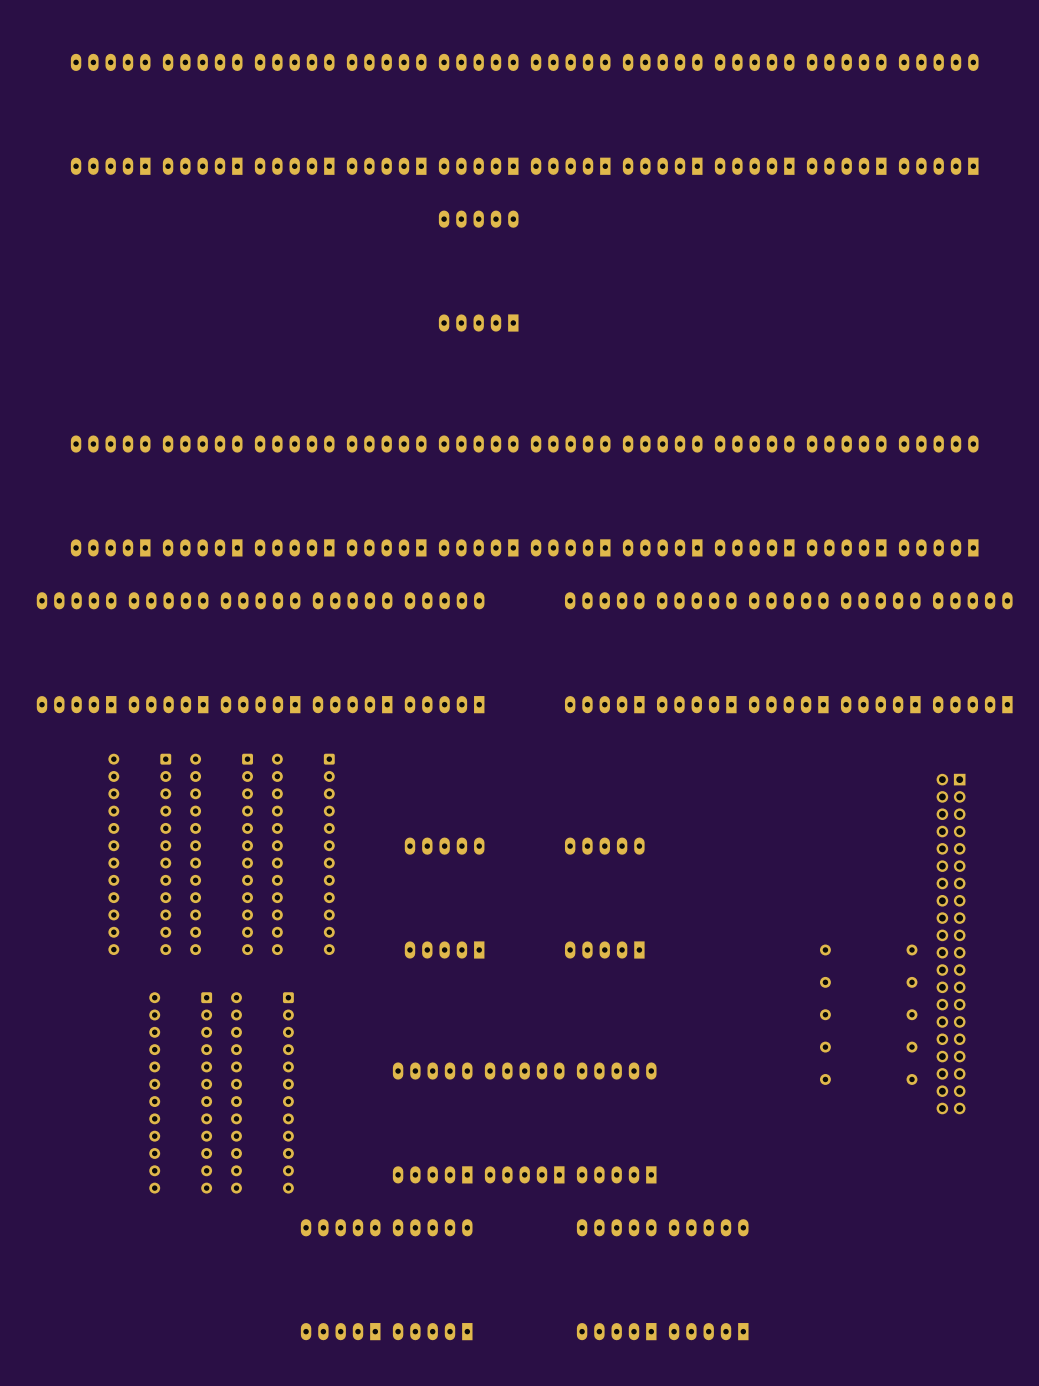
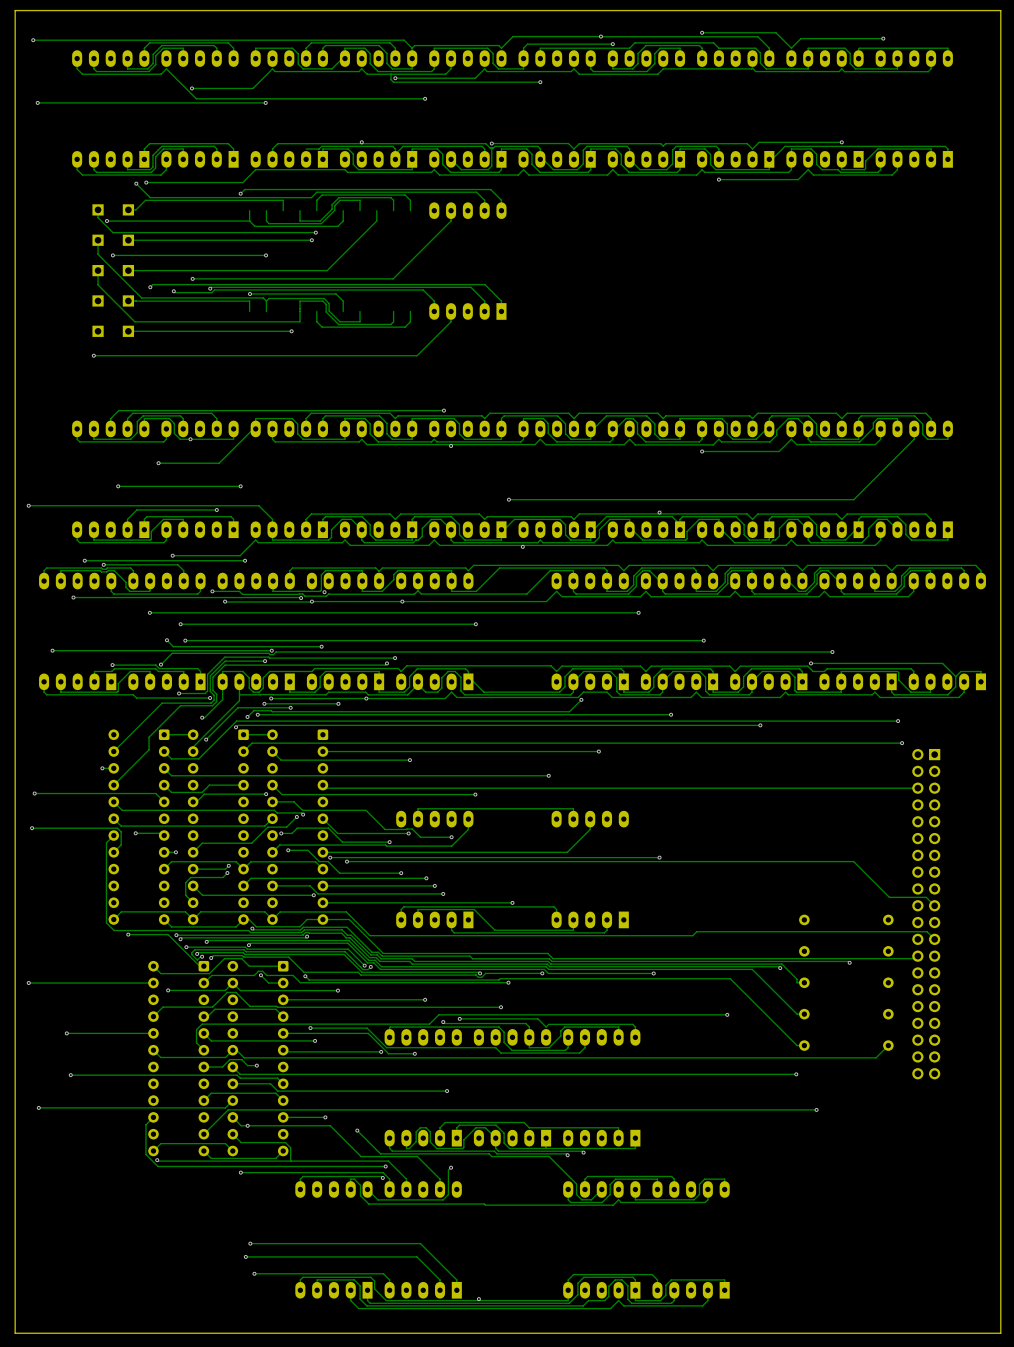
board edge: none -> (1000, 10) (15, 10) (15, 1333) (1000, 1333) (1000, 10)
track: none -> (702, 32) (775, 32) (791, 48) (801, 38) (883, 38)
via: none -> (702, 32)
via: none -> (600, 36)
via: none -> (883, 38)
track: none -> (33, 40) (404, 40) (412, 48)
via: none -> (33, 40)
track: none -> (612, 44) (527, 44) (523, 48) (523, 68) (498, 68) (493, 63) (493, 53) (487, 48) (434, 48) (434, 68) (431, 71) (378, 71) (370, 63) (370, 53) (364, 48) (344, 48) (344, 58)
via: none -> (612, 44)
track: none -> (412, 48) (412, 68) (392, 68) (386, 63) (386, 53) (379, 45) (325, 45) (322, 48) (322, 58)
track: none -> (412, 48) (414, 45) (498, 45) (501, 48) (513, 36) (757, 36) (769, 48) (769, 58)
track: none -> (344, 55) (331, 68) (303, 68) (298, 63) (298, 53) (292, 48) (255, 48) (255, 58)
track: none -> (77, 58) (77, 68) (82, 74) (161, 74) (166, 68) (196, 98) (425, 98)
track: none -> (183, 58) (183, 48) (163, 48) (155, 55) (155, 64) (148, 71) (96, 71) (93, 68) (93, 58)
track: none -> (216, 58) (216, 48) (214, 45) (161, 45) (153, 54) (153, 63) (147, 68) (127, 68) (127, 58)
track: none -> (233, 58) (233, 48) (228, 42) (149, 42) (144, 48) (144, 58)
track: none -> (395, 58) (395, 48) (390, 42) (311, 42) (306, 48) (306, 58)
track: none -> (451, 58) (451, 68) (445, 74) (367, 74) (361, 68) (359, 71) (275, 71) (272, 68) (252, 88) (191, 88)
track: none -> (680, 58) (680, 48) (660, 48) (654, 53) (654, 63) (646, 71) (593, 71) (590, 68) (590, 58)
track: none -> (702, 58) (702, 48) (699, 45) (646, 45) (638, 53) (638, 63) (632, 68) (612, 68) (612, 58)
track: none -> (897, 58) (897, 68) (855, 68) (850, 63) (850, 53) (844, 48) (808, 48) (808, 68) (766, 68) (760, 63) (760, 53) (755, 48) (718, 48) (713, 42) (634, 42) (629, 48) (540, 48) (540, 58)
track: none -> (931, 58) (931, 68) (928, 71) (844, 71) (841, 68) (839, 71) (755, 71) (752, 68) (663, 68) (657, 74) (579, 74) (573, 68) (571, 71) (487, 71) (484, 68) (475, 78) (395, 78)
track: none -> (947, 58) (947, 48) (859, 48) (858, 58)
track: none -> (391, 74) (391, 79) (393, 82) (540, 82)
via: none -> (395, 78)
via: none -> (540, 82)
via: none -> (191, 88)
via: none -> (425, 98)
via: none -> (37, 102)
track: none -> (265, 102) (37, 102)
via: none -> (265, 102)
via: none -> (361, 142)
track: none -> (841, 142) (759, 142) (752, 149) (747, 143) (665, 143) (663, 146) (660, 143) (579, 143) (573, 149) (568, 143) (491, 143)
via: none -> (841, 142)
via: none -> (491, 143)
track: none -> (491, 148) (491, 166) (488, 169) (461, 169) (451, 159)
track: none -> (306, 149) (319, 149) (321, 146) (392, 146) (395, 149) (395, 159)
track: none -> (395, 154) (403, 146) (482, 146) (484, 149) (484, 159)
track: none -> (540, 156) (553, 169) (577, 169) (583, 163) (583, 150) (587, 146) (626, 146) (629, 149) (629, 159) (639, 169) (666, 169) (672, 163) (672, 150) (676, 146) (716, 146) (718, 149) (718, 159)
track: none -> (166, 159) (166, 169) (161, 175) (82, 175) (77, 169) (77, 159)
track: none -> (183, 159) (183, 149) (163, 149) (155, 156) (155, 168) (151, 172) (96, 172) (93, 169) (93, 159)
track: none -> (216, 159) (216, 149) (214, 146) (161, 146) (152, 155) (152, 167) (150, 169) (127, 169) (127, 159)
track: none -> (233, 159) (233, 149) (228, 143) (149, 143) (144, 149) (144, 159)
track: none -> (540, 159) (540, 149) (537, 146) (490, 148) (485, 143) (277, 143) (272, 149) (272, 159)
track: none -> (769, 159) (769, 169) (715, 169) (710, 164) (710, 154) (705, 149) (680, 149) (680, 169) (677, 172) (629, 172) (621, 164) (621, 154) (615, 149) (590, 149) (590, 169) (588, 172) (540, 172) (531, 164) (531, 154) (526, 149) (501, 149) (501, 169) (498, 172) (450, 172) (442, 164) (442, 154) (437, 149) (412, 149) (412, 169) (358, 169) (353, 164) (353, 154) (348, 149) (322, 149) (322, 159)
track: none -> (880, 159) (880, 169) (878, 172) (840, 172) (838, 169) (822, 169) (816, 164) (816, 154) (811, 149) (791, 149) (791, 169) (788, 172) (704, 172) (702, 169) (696, 175) (618, 175) (612, 169) (607, 175) (528, 175) (523, 169) (518, 175) (439, 175) (434, 169) (431, 172) (255, 169) (242, 182) (146, 182)
track: none -> (897, 159) (897, 169) (892, 175) (813, 175) (808, 169) (798, 179) (718, 179)
track: none -> (931, 159) (931, 149) (877, 149) (865, 161) (864, 169) (841, 169) (841, 159)
track: none -> (947, 159) (947, 149) (945, 146) (785, 146) (769, 162)
via: none -> (718, 179)
via: none -> (146, 182)
track: none -> (136, 183) (150, 197) (311, 197) (316, 192) (476, 192) (484, 200) (484, 210)
via: none -> (136, 183)
track: none -> (240, 193) (244, 189) (490, 189) (501, 200) (501, 210)
via: none -> (240, 193)
track: none -> (98, 209) (98, 217) (112, 232) (315, 232)
part: none -> (98, 209)
track: none -> (128, 209) (136, 209) (145, 200) (283, 200) (283, 210)
part: none -> (128, 209)
track: none -> (249, 210) (249, 221)
track: none -> (343, 210) (343, 221) (337, 226) (254, 226) (249, 221)
track: none -> (360, 210) (360, 200) (340, 200) (334, 205) (334, 210) (321, 223) (269, 223) (266, 221) (266, 210)
track: none -> (376, 210) (376, 221) (327, 270) (128, 270)
track: none -> (393, 210) (393, 200) (390, 197) (339, 197) (332, 204) (332, 209) (320, 221) (300, 221) (300, 210)
track: none -> (410, 210) (410, 200) (405, 195) (322, 195) (316, 200) (316, 210)
track: none -> (451, 210) (451, 221) (393, 278) (192, 278)
via: none -> (106, 221)
track: none -> (249, 221) (106, 221)
via: none -> (315, 232)
track: none -> (98, 240) (98, 254) (141, 297) (263, 297) (266, 301)
part: none -> (98, 240)
part: none -> (128, 240)
track: none -> (311, 240) (128, 240)
via: none -> (311, 240)
via: none -> (112, 255)
track: none -> (266, 255) (112, 255)
via: none -> (266, 255)
track: none -> (98, 270) (98, 284) (134, 321) (300, 321) (300, 301) (322, 301) (326, 304) (326, 311) (338, 324) (390, 324) (393, 321) (393, 311)
part: none -> (98, 270)
part: none -> (128, 270)
via: none -> (192, 278)
track: none -> (150, 287) (153, 284) (484, 284) (501, 301) (501, 311)
via: none -> (150, 287)
track: none -> (210, 288) (470, 287) (484, 301) (484, 311)
via: none -> (210, 288)
track: none -> (173, 291) (211, 292) (214, 290) (423, 290) (434, 301) (434, 311)
via: none -> (173, 291)
track: none -> (250, 293) (336, 293) (343, 301) (343, 311)
via: none -> (250, 293)
part: none -> (98, 300)
track: none -> (128, 300) (249, 301) (249, 311)
part: none -> (128, 300)
track: none -> (266, 301) (266, 311)
track: none -> (266, 301) (269, 298) (324, 298) (329, 303) (329, 311) (339, 321) (360, 321) (360, 311)
track: none -> (410, 311) (410, 321) (405, 327) (322, 327) (316, 321) (316, 311)
track: none -> (451, 311) (451, 321) (417, 355) (93, 355)
part: none -> (98, 331)
part: none -> (128, 331)
track: none -> (291, 331) (128, 331)
via: none -> (291, 331)
via: none -> (93, 355)
track: none -> (443, 410) (118, 410) (110, 418) (110, 428)
via: none -> (443, 410)
track: none -> (255, 426) (219, 463) (158, 463)
track: none -> (769, 426) (756, 439) (732, 439) (727, 433) (727, 424) (721, 418) (680, 418) (680, 439) (660, 439) (654, 433) (654, 423) (646, 415) (606, 415) (590, 431)
track: none -> (166, 428) (166, 439) (163, 441) (79, 441) (77, 439) (77, 428)
track: none -> (183, 428) (183, 418) (180, 415) (143, 415) (137, 421) (137, 432) (130, 439) (93, 439) (93, 428)
track: none -> (216, 428) (216, 418) (211, 413) (132, 413) (127, 418) (127, 428)
track: none -> (233, 428) (233, 439) (180, 439) (174, 433) (174, 423) (169, 418) (144, 418) (144, 428)
track: none -> (590, 428) (590, 439) (570, 439) (565, 433) (565, 423) (557, 415) (504, 415) (501, 418) (501, 439) (464, 439) (459, 433) (459, 424) (454, 418) (412, 418) (412, 439) (392, 439) (386, 433) (386, 423) (379, 415) (325, 415) (322, 418) (322, 428)
track: none -> (612, 428) (612, 439) (610, 441) (556, 441) (548, 433) (548, 423) (543, 418) (523, 418) (523, 439) (520, 441) (436, 441) (434, 439) (431, 441) (378, 441) (370, 433) (370, 423) (364, 418) (344, 418) (344, 439) (303, 439) (297, 433) (297, 424) (292, 418) (255, 418) (255, 428)
track: none -> (702, 428) (702, 439) (699, 441) (645, 441) (637, 433) (637, 423) (633, 418) (625, 418) (612, 431)
track: none -> (880, 428) (880, 439) (875, 444) (796, 444) (791, 439) (779, 451) (702, 451)
track: none -> (897, 428) (897, 418) (877, 418) (873, 422) (873, 428) (859, 441) (810, 441) (808, 439) (808, 428) (797, 418) (788, 418) (776, 430) (776, 435) (770, 441) (721, 441) (718, 439) (713, 444) (635, 444) (629, 439) (624, 444) (545, 444) (540, 439) (535, 444) (367, 444) (361, 439) (359, 441) (275, 441) (272, 439) (272, 428)
track: none -> (914, 428) (914, 439) (853, 499) (508, 499)
track: none -> (931, 428) (931, 418) (925, 413) (847, 413) (841, 418) (836, 413) (757, 413) (752, 418) (749, 415) (665, 415) (663, 418) (657, 413) (579, 413) (573, 418) (568, 413) (489, 413) (484, 418) (482, 415) (398, 415) (395, 418) (390, 413) (311, 413) (306, 418) (306, 428)
track: none -> (947, 428) (947, 439) (927, 439) (922, 434) (922, 423) (914, 415) (861, 415) (858, 418) (858, 439) (822, 439) (816, 433) (816, 424) (808, 415) (771, 415) (769, 418) (769, 428)
via: none -> (190, 439)
via: none -> (451, 445)
via: none -> (702, 451)
via: none -> (158, 463)
via: none -> (118, 486)
track: none -> (240, 486) (118, 486)
via: none -> (240, 486)
via: none -> (508, 499)
track: none -> (28, 505) (258, 505) (272, 519) (272, 540) (328, 540) (331, 537) (331, 529) (341, 519) (351, 519) (361, 529) (361, 540) (364, 542) (413, 542) (422, 536) (422, 528) (431, 519) (440, 519) (451, 529) (451, 540) (453, 542) (537, 542) (540, 540) (543, 542) (594, 542) (599, 537) (599, 529) (609, 519) (629, 519) (629, 529)
via: none -> (28, 505)
track: none -> (216, 510) (136, 510) (127, 519) (127, 529)
via: none -> (216, 510)
via: none -> (659, 512)
track: none -> (680, 524) (672, 516) (606, 516) (590, 532)
track: none -> (629, 527) (642, 540) (685, 540) (687, 531) (699, 519) (718, 519) (718, 529)
track: none -> (718, 527) (734, 542) (770, 542) (779, 536) (779, 528) (788, 519) (797, 519) (808, 529) (808, 540) (810, 542) (861, 542) (868, 535) (868, 528) (877, 519) (887, 519) (897, 529)
track: none -> (858, 527) (845, 540) (822, 540) (816, 534) (816, 524) (808, 516) (771, 516) (769, 519) (769, 540) (749, 540) (744, 534) (744, 524) (736, 516) (682, 516) (680, 519) (680, 529)
track: none -> (166, 529) (166, 540) (163, 542) (79, 542) (77, 540) (77, 529)
track: none -> (183, 529) (183, 519) (163, 519) (151, 531) (150, 540) (93, 540) (93, 529)
track: none -> (233, 529) (233, 519) (230, 516) (146, 516) (144, 519) (144, 529)
track: none -> (501, 529) (501, 540) (464, 540) (459, 534) (459, 524) (451, 516) (414, 516) (412, 519) (412, 540) (375, 540) (370, 534) (370, 524) (362, 516) (325, 516) (322, 519) (322, 529)
track: none -> (590, 529) (590, 540) (570, 540) (565, 534) (565, 524) (560, 519) (514, 519) (501, 532)
track: none -> (880, 529) (880, 540) (875, 545) (796, 545) (791, 540) (786, 545) (707, 545) (702, 540) (699, 542) (615, 542) (612, 540) (607, 545) (439, 545) (434, 540) (428, 545) (350, 545) (344, 540) (342, 542) (258, 542) (255, 540) (240, 555) (172, 555)
track: none -> (931, 529) (931, 519) (925, 514) (847, 514) (841, 519) (836, 514) (757, 514) (752, 519) (747, 513) (579, 513) (573, 519) (571, 516) (487, 516) (484, 519) (479, 514) (400, 514) (395, 519) (390, 514) (311, 514) (306, 519) (306, 529)
track: none -> (947, 529) (947, 540) (911, 540) (905, 534) (905, 524) (897, 516) (861, 516) (858, 519) (858, 529)
via: none -> (522, 546)
via: none -> (172, 555)
via: none -> (84, 560)
track: none -> (245, 560) (84, 560)
via: none -> (245, 560)
track: none -> (103, 564) (177, 564) (183, 570) (183, 581)
via: none -> (103, 564)
track: none -> (785, 578) (798, 591) (805, 591) (814, 582) (814, 573) (819, 568) (872, 568) (874, 570) (874, 591) (895, 591) (901, 584) (901, 576) (909, 568) (961, 568) (964, 570) (964, 581)
track: none -> (133, 581) (133, 570) (130, 568) (46, 568) (44, 570) (44, 581)
track: none -> (150, 581) (149, 591) (129, 591) (125, 587) (125, 582) (114, 570) (60, 570) (60, 581)
track: none -> (200, 581) (200, 591) (197, 594) (113, 594) (111, 591) (111, 581)
track: none -> (662, 581) (662, 591) (665, 594) (717, 594) (727, 583) (727, 574) (731, 570) (751, 570) (751, 591) (754, 594) (806, 594) (817, 583) (817, 574) (821, 570) (828, 570) (841, 583)
track: none -> (785, 581) (785, 570) (782, 568) (730, 568) (725, 573) (725, 582) (716, 591) (696, 591) (696, 570) (693, 568) (641, 568) (633, 576) (633, 584) (627, 591) (607, 591) (607, 570) (604, 568) (499, 568) (476, 591) (451, 591) (451, 570) (397, 570) (393, 574) (393, 579) (382, 591) (362, 591) (362, 570) (325, 570) (321, 574) (320, 591) (273, 591) (273, 581)
track: none -> (913, 581) (913, 591) (908, 596) (829, 596) (824, 591) (819, 596) (740, 596) (735, 591) (729, 596) (651, 596) (645, 591) (640, 596) (561, 596) (556, 591) (546, 601) (225, 601)
track: none -> (930, 581) (930, 570) (910, 570) (904, 577) (904, 586) (896, 594) (843, 594) (841, 591) (841, 581)
track: none -> (980, 581) (980, 570) (975, 565) (896, 565) (891, 570) (886, 565) (807, 565) (802, 570) (797, 565) (718, 565) (713, 570) (707, 565) (629, 565) (623, 570) (618, 565) (473, 565) (468, 570) (465, 568) (382, 568) (379, 571) (375, 568) (292, 568) (289, 570) (289, 581)
track: none -> (662, 583) (649, 570) (642, 570) (636, 577) (636, 586) (628, 594) (576, 594) (573, 591) (573, 570) (550, 570) (526, 594) (421, 594) (418, 590) (414, 594) (328, 593) (326, 596) (304, 596) (302, 594) (242, 594) (239, 591) (212, 591)
via: none -> (212, 591)
via: none -> (324, 592)
track: none -> (73, 597) (301, 598)
via: none -> (73, 597)
via: none -> (301, 598)
via: none -> (225, 601)
via: none -> (311, 601)
via: none -> (402, 601)
via: none -> (149, 612)
track: none -> (638, 612) (149, 612)
via: none -> (638, 612)
via: none -> (180, 624)
track: none -> (475, 624) (180, 624)
via: none -> (475, 624)
track: none -> (166, 640) (173, 646) (321, 646)
via: none -> (166, 640)
via: none -> (185, 640)
track: none -> (703, 640) (185, 640)
via: none -> (703, 640)
via: none -> (321, 646)
via: none -> (52, 650)
track: none -> (271, 650) (52, 650)
via: none -> (271, 650)
track: none -> (832, 652) (276, 652) (273, 654) (172, 653) (160, 664)
via: none -> (832, 652)
track: none -> (395, 658) (224, 657) (207, 674) (207, 691) (205, 693) (179, 693)
via: none -> (395, 658)
track: none -> (265, 661) (225, 661) (210, 676) (210, 691) (214, 695) (214, 700) (211, 703) (162, 703) (113, 751)
via: none -> (265, 661)
track: none -> (386, 663) (385, 665) (225, 665) (212, 677) (212, 690) (216, 694) (216, 701) (212, 705) (180, 705) (148, 737) (148, 749) (113, 785)
via: none -> (386, 663)
track: none -> (811, 663) (942, 663) (955, 676)
via: none -> (811, 663)
via: none -> (160, 664)
track: none -> (112, 665) (155, 665) (159, 668) (197, 668) (200, 671) (200, 681)
via: none -> (112, 665)
track: none -> (468, 676) (483, 692) (559, 692) (565, 686) (565, 676) (572, 668) (621, 668) (623, 671) (623, 692) (648, 692) (653, 687) (653, 677) (662, 668) (710, 668) (713, 671) (713, 692) (738, 692) (743, 686) (743, 676) (751, 668) (799, 668) (802, 671) (802, 681)
track: none -> (955, 676) (960, 671) (980, 671) (980, 681)
track: none -> (955, 676) (955, 686) (947, 694) (894, 694) (891, 692) (891, 681)
track: none -> (44, 681) (44, 692) (46, 694) (133, 694) (136, 698) (210, 698)
track: none -> (150, 681) (150, 671) (130, 671) (118, 683) (117, 692) (60, 692) (60, 681)
track: none -> (183, 681) (183, 671) (158, 671) (155, 668) (114, 668) (111, 671) (94, 671) (94, 681)
track: none -> (239, 681) (239, 700) (193, 747) (193, 751)
track: none -> (468, 681) (468, 671) (465, 668) (417, 668) (409, 676) (409, 686) (404, 692) (379, 692) (379, 671) (325, 671) (320, 676) (320, 687) (315, 692) (289, 692) (289, 681)
track: none -> (913, 681) (913, 671) (911, 668) (827, 668) (824, 671) (813, 671) (807, 666) (740, 666) (735, 671) (729, 666) (651, 666) (645, 671) (640, 666) (561, 666) (556, 671) (550, 665) (406, 665) (401, 671) (398, 668) (314, 668) (311, 671) (269, 671) (263, 677) (263, 688) (259, 692) (253, 692) (249, 688) (249, 677) (242, 671) (222, 671) (222, 699) (204, 717) (202, 717)
track: none -> (930, 681) (930, 692) (910, 692) (898, 680) (897, 671) (841, 671) (841, 692) (796, 692) (794, 677) (789, 671) (762, 671) (751, 681) (751, 692) (749, 694) (709, 694) (705, 690) (705, 677) (699, 671) (673, 671) (662, 681) (662, 692) (660, 694) (620, 694) (616, 691) (616, 677) (610, 671) (583, 671) (573, 681) (573, 692) (570, 694) (464, 694) (460, 690) (460, 677) (455, 671) (448, 671) (441, 677) (441, 688) (437, 692) (425, 692) (418, 684)
track: none -> (964, 681) (964, 692) (958, 697) (880, 697) (874, 692) (872, 694) (788, 694) (785, 692) (780, 697) (701, 697) (696, 692) (690, 697) (612, 697) (607, 692) (583, 692) (578, 697) (456, 697) (451, 692) (445, 698) (271, 698)
track: none -> (418, 684) (407, 694) (368, 694) (365, 692) (328, 692) (326, 694) (239, 694)
via: none -> (179, 693)
via: none -> (210, 698)
via: none -> (271, 698)
via: none -> (366, 698)
track: none -> (581, 699) (569, 711) (253, 710) (247, 716)
via: none -> (581, 699)
via: none -> (264, 703)
track: none -> (338, 703) (264, 703)
via: none -> (338, 703)
track: none -> (290, 707) (237, 707) (206, 739)
via: none -> (290, 707)
via: none -> (257, 714)
track: none -> (671, 714) (257, 714)
via: none -> (671, 714)
via: none -> (247, 716)
via: none -> (202, 717)
track: none -> (898, 721) (236, 721) (198, 758) (171, 758) (164, 751)
via: none -> (898, 721)
track: none -> (760, 725) (237, 725) (236, 727)
via: none -> (760, 725)
via: none -> (236, 727)
track: none -> (193, 734) (164, 734)
track: none -> (272, 734) (243, 734)
via: none -> (206, 739)
track: none -> (902, 743) (251, 743) (243, 751)
via: none -> (902, 743)
track: none -> (272, 751) (281, 760) (409, 760)
track: none -> (598, 751) (322, 751)
via: none -> (598, 751)
via: none -> (409, 760)
via: none -> (102, 768)
track: none -> (113, 768) (102, 768)
track: none -> (164, 768) (171, 775) (548, 775)
via: none -> (548, 775)
track: none -> (243, 785) (209, 785) (202, 792) (171, 792) (164, 785)
track: none -> (272, 785) (281, 794) (475, 794)
track: none -> (322, 785) (325, 788) (917, 788)
track: none -> (34, 793) (155, 793) (164, 801)
via: none -> (34, 793)
track: none -> (266, 794) (204, 794) (196, 801) (193, 801)
via: none -> (266, 794)
via: none -> (475, 794)
track: none -> (113, 801) (122, 810) (274, 810) (277, 812) (301, 812) (303, 814)
track: none -> (272, 801) (294, 801) (302, 810) (365, 810) (385, 829) (412, 829) (420, 837) (451, 837)
via: none -> (303, 814)
track: none -> (296, 816) (286, 827) (267, 827) (251, 843) (202, 843) (193, 852)
via: none -> (296, 816)
track: none -> (272, 818) (264, 826) (121, 826) (113, 818)
track: none -> (322, 818) (337, 833) (408, 833)
track: none -> (468, 819) (468, 829) (451, 846) (279, 845) (272, 852)
track: none -> (573, 819) (573, 808) (418, 808) (418, 819)
track: none -> (590, 819) (590, 829) (567, 852) (322, 852)
track: none -> (32, 828) (117, 828) (121, 831) (121, 844) (113, 852)
via: none -> (32, 828)
track: none -> (135, 833) (161, 833) (164, 835)
via: none -> (135, 833)
track: none -> (281, 833) (292, 833) (297, 828) (328, 828) (342, 842) (389, 842)
via: none -> (281, 833)
via: none -> (408, 833)
track: none -> (113, 835) (106, 842) (106, 922) (114, 930) (248, 930) (250, 932) (301, 932) (303, 930)
via: none -> (451, 837)
via: none -> (389, 842)
track: none -> (288, 850) (307, 850) (319, 861) (328, 861) (339, 873) (401, 873)
via: none -> (288, 850)
track: none -> (175, 852) (164, 852)
via: none -> (175, 852)
via: none -> (330, 857)
track: none -> (659, 857) (330, 857)
via: none -> (659, 857)
track: none -> (346, 861) (853, 861) (889, 897) (926, 897) (934, 905)
via: none -> (346, 861)
track: none -> (228, 865) (225, 869) (193, 869)
via: none -> (228, 865)
track: none -> (322, 869) (315, 861) (250, 861) (243, 869) (236, 861) (171, 861) (164, 869)
track: none -> (227, 873) (222, 877) (190, 877) (185, 882) (185, 895) (193, 902)
via: none -> (227, 873)
via: none -> (401, 873)
track: none -> (426, 878) (251, 878) (243, 885)
via: none -> (426, 878)
track: none -> (193, 885) (202, 895) (313, 895)
track: none -> (272, 885) (310, 885) (318, 893) (443, 893)
track: none -> (434, 885) (322, 885)
via: none -> (434, 885)
via: none -> (443, 893)
via: none -> (313, 895)
track: none -> (322, 902) (512, 902)
via: none -> (512, 902)
track: none -> (113, 919) (121, 911) (185, 911) (193, 919) (200, 911) (264, 911) (272, 919) (280, 911) (346, 911) (370, 935) (692, 935) (696, 931) (927, 931) (934, 939)
track: none -> (164, 919) (171, 926) (236, 926) (243, 919) (248, 919) (256, 926) (299, 926) (307, 919) (349, 919) (383, 953) (547, 953) (553, 958) (915, 958) (917, 956)
track: none -> (556, 919) (556, 909) (553, 906) (403, 906) (401, 909) (401, 919)
track: none -> (573, 919) (573, 930) (494, 930) (474, 909) (418, 909) (418, 919)
track: none -> (607, 919) (607, 930) (604, 932) (454, 932) (451, 930) (451, 919)
via: none -> (252, 928)
track: none -> (302, 927) (346, 927) (371, 952) (378, 952) (382, 956) (469, 956) (472, 958) (549, 958) (552, 961) (849, 962)
track: none -> (302, 927) (300, 929) (252, 928)
track: none -> (303, 930) (342, 929) (347, 935) (351, 935) (370, 954) (377, 954) (381, 958) (412, 958) (414, 961) (548, 961) (550, 964) (781, 964) (797, 979) (797, 982) (804, 982)
track: none -> (128, 934) (168, 934) (199, 966) (203, 966)
via: none -> (128, 934)
track: none -> (176, 935) (302, 935) (305, 932) (341, 933) (346, 937) (350, 937) (369, 957) (376, 957) (379, 961) (409, 961) (412, 964) (780, 968)
via: none -> (176, 935)
track: none -> (307, 936) (180, 939)
via: none -> (307, 936)
via: none -> (180, 939)
track: none -> (206, 941) (348, 940) (368, 960) (375, 960) (381, 966) (752, 969) (797, 1014) (804, 1014)
via: none -> (206, 941)
track: none -> (248, 945) (250, 943) (347, 943) (367, 962) (373, 962) (380, 969) (544, 969) (548, 973) (653, 973)
via: none -> (248, 945)
track: none -> (186, 947) (348, 949) (364, 965)
via: none -> (186, 947)
track: none -> (197, 953) (344, 954) (361, 972) (480, 973)
via: none -> (197, 953)
track: none -> (202, 956) (197, 959) (191, 952) (194, 949) (345, 951) (363, 969) (368, 969) (370, 966)
via: none -> (202, 956)
track: none -> (211, 958) (213, 955) (288, 957) (303, 972) (358, 972) (360, 975) (476, 975) (481, 977) (485, 973) (542, 973)
via: none -> (211, 958)
via: none -> (849, 962)
track: none -> (283, 966) (249, 966) (241, 958) (224, 958) (209, 973) (160, 973) (153, 966)
via: none -> (364, 965)
via: none -> (370, 966)
via: none -> (780, 968)
via: none -> (480, 973)
via: none -> (542, 973)
via: none -> (653, 973)
track: none -> (260, 975) (268, 983) (283, 983)
via: none -> (260, 975)
track: none -> (305, 976) (309, 980) (730, 978) (797, 1045) (804, 1045)
via: none -> (305, 976)
via: none -> (28, 983)
track: none -> (153, 983) (28, 983)
track: none -> (508, 982) (300, 982) (293, 975) (266, 975) (262, 971) (258, 971) (254, 975) (211, 975) (203, 983)
via: none -> (508, 982)
track: none -> (168, 990) (225, 990) (232, 983) (240, 990) (337, 990)
via: none -> (168, 990)
via: none -> (337, 990)
track: none -> (425, 999) (283, 999)
via: none -> (425, 999)
track: none -> (501, 1007) (249, 1006) (236, 992) (227, 992) (212, 1007) (162, 1007) (153, 1016)
via: none -> (501, 1007)
track: none -> (727, 1014) (438, 1014) (429, 1024) (202, 1024) (196, 1029) (196, 1042) (203, 1050)
via: none -> (727, 1014)
track: none -> (283, 1016) (275, 1009) (214, 1009) (207, 1016) (203, 1016)
track: none -> (459, 1018) (537, 1018) (546, 1027) (548, 1024) (632, 1024) (635, 1027) (635, 1037)
via: none -> (459, 1018)
track: none -> (443, 1022) (525, 1023) (529, 1027) (529, 1047) (549, 1047) (560, 1035) (560, 1030) (564, 1027) (618, 1027) (618, 1037)
via: none -> (443, 1022)
track: none -> (310, 1028) (367, 1028) (386, 1047) (495, 1047) (501, 1053) (579, 1053) (584, 1047) (584, 1037)
via: none -> (310, 1028)
via: none -> (66, 1033)
track: none -> (153, 1033) (66, 1033)
track: none -> (203, 1033) (211, 1040) (315, 1040)
track: none -> (283, 1033) (368, 1033) (388, 1053) (414, 1053)
track: none -> (568, 1037) (568, 1047) (565, 1050) (512, 1050) (504, 1042) (504, 1032) (498, 1027) (390, 1027) (389, 1037)
via: none -> (315, 1040)
track: none -> (888, 1045) (876, 1057) (244, 1057) (236, 1050) (232, 1050) (225, 1057) (160, 1057) (153, 1050)
track: none -> (283, 1050) (284, 1051) (381, 1051)
via: none -> (381, 1051)
via: none -> (414, 1053)
track: none -> (256, 1065) (247, 1065) (241, 1059) (229, 1059) (222, 1067) (203, 1067)
via: none -> (256, 1065)
track: none -> (232, 1067) (240, 1074) (796, 1074)
track: none -> (70, 1075) (237, 1075) (240, 1078) (277, 1078) (283, 1083)
via: none -> (70, 1075)
via: none -> (796, 1074)
track: none -> (232, 1083) (270, 1083) (277, 1091) (447, 1091)
via: none -> (447, 1091)
track: none -> (232, 1100) (225, 1107) (38, 1107)
track: none -> (283, 1100) (275, 1093) (211, 1093) (203, 1100)
via: none -> (38, 1107)
track: none -> (816, 1109) (228, 1109) (203, 1134)
via: none -> (816, 1109)
track: none -> (153, 1117) (146, 1124) (146, 1154) (157, 1166) (385, 1166)
track: none -> (232, 1117) (241, 1125) (330, 1125) (361, 1156) (417, 1156) (440, 1179) (440, 1189)
track: none -> (325, 1117) (283, 1117)
via: none -> (325, 1117)
via: none -> (247, 1125)
track: none -> (357, 1130) (380, 1153) (489, 1153) (491, 1156) (549, 1156) (576, 1184) (576, 1194) (581, 1199) (591, 1199) (601, 1189)
via: none -> (357, 1130)
track: none -> (232, 1134) (241, 1142) (285, 1142) (290, 1147) (290, 1161)
track: none -> (389, 1138) (389, 1148) (392, 1151) (494, 1151) (497, 1153) (567, 1155)
track: none -> (406, 1138) (406, 1148) (409, 1148) (416, 1141) (416, 1131) (420, 1127) (426, 1127) (430, 1131) (430, 1142) (436, 1148) (462, 1148) (463, 1139) (476, 1127) (485, 1127) (495, 1138) (495, 1148) (498, 1151) (583, 1152)
track: none -> (546, 1138) (546, 1148) (509, 1148) (504, 1143) (504, 1133) (496, 1125) (459, 1125) (456, 1127) (456, 1138)
track: none -> (618, 1138) (618, 1127) (529, 1127) (523, 1122) (445, 1122) (440, 1127) (440, 1138)
track: none -> (635, 1138) (635, 1148) (546, 1147)
track: none -> (232, 1150) (225, 1143) (160, 1143) (153, 1150)
track: none -> (283, 1150) (275, 1158) (211, 1158) (203, 1150)
via: none -> (583, 1152)
via: none -> (567, 1155)
track: none -> (157, 1160) (388, 1161) (406, 1179) (406, 1189)
via: none -> (157, 1160)
via: none -> (385, 1166)
track: none -> (451, 1167) (448, 1170) (448, 1194) (443, 1199) (378, 1199) (367, 1189)
via: none -> (451, 1167)
track: none -> (240, 1172) (383, 1172) (389, 1179) (389, 1189)
via: none -> (240, 1172)
track: none -> (382, 1177) (303, 1176) (300, 1179) (300, 1189)
via: none -> (382, 1177)
track: none -> (657, 1189) (657, 1179) (615, 1179) (610, 1184) (610, 1194) (602, 1202) (570, 1202) (568, 1199) (568, 1189)
track: none -> (674, 1189) (674, 1179) (671, 1176) (587, 1176) (584, 1179) (584, 1189)
track: none -> (707, 1189) (707, 1199) (705, 1202) (621, 1202) (618, 1199) (613, 1205) (368, 1204) (360, 1195) (360, 1185) (354, 1179) (350, 1179) (350, 1189)
track: none -> (724, 1189) (724, 1179) (704, 1179) (699, 1184) (699, 1194) (694, 1199) (635, 1199) (635, 1189)
track: none -> (250, 1243) (420, 1243) (456, 1279) (456, 1290)
via: none -> (250, 1243)
track: none -> (245, 1256) (417, 1256) (440, 1279) (440, 1290)
via: none -> (245, 1256)
track: none -> (254, 1273) (383, 1273) (389, 1279) (389, 1290)
via: none -> (254, 1273)
track: none -> (657, 1290) (657, 1279) (652, 1274) (573, 1274) (568, 1279) (568, 1300) (386, 1300) (374, 1288) (374, 1281) (370, 1277) (303, 1277) (300, 1279) (300, 1290)
track: none -> (674, 1290) (674, 1300) (671, 1303) (631, 1303) (627, 1299) (627, 1285) (622, 1279) (615, 1279) (608, 1286) (608, 1296) (604, 1300) (588, 1300) (583, 1305) (366, 1305) (360, 1299) (360, 1285) (354, 1279) (317, 1279) (317, 1290)
track: none -> (707, 1290) (707, 1300) (702, 1305) (623, 1305) (618, 1300) (610, 1308) (358, 1308) (350, 1300) (350, 1290)
track: none -> (724, 1290) (724, 1279) (671, 1279) (665, 1285) (665, 1295) (660, 1300) (635, 1300) (635, 1279) (632, 1277) (583, 1277) (577, 1283) (577, 1294) (569, 1303) (370, 1303) (367, 1300) (367, 1290)
via: none -> (478, 1299)

